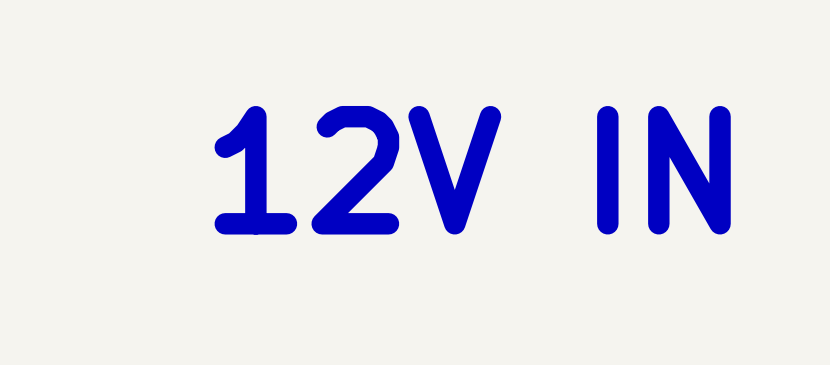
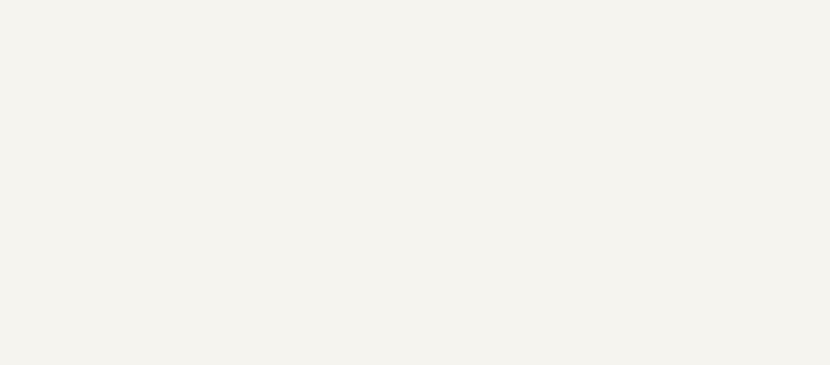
text: 12V IN (472, 170) -> none

